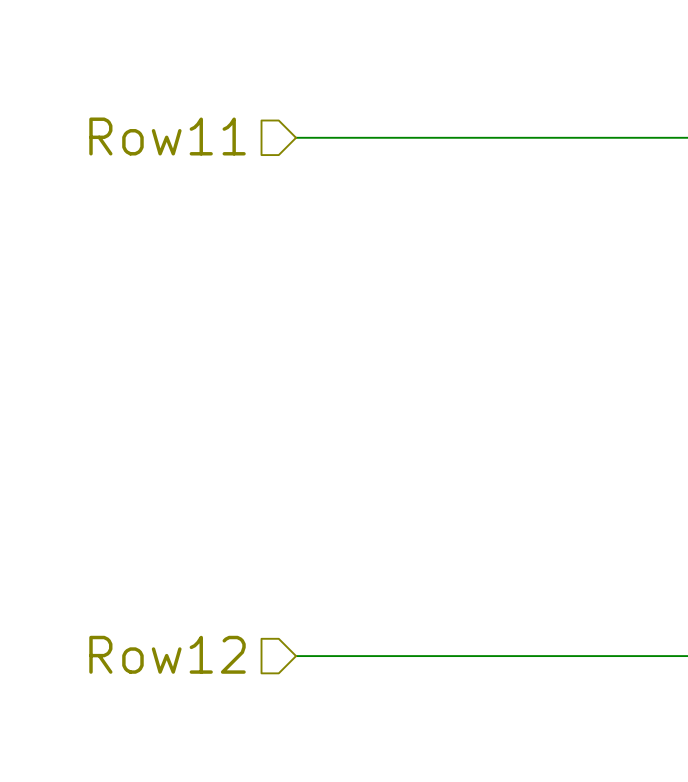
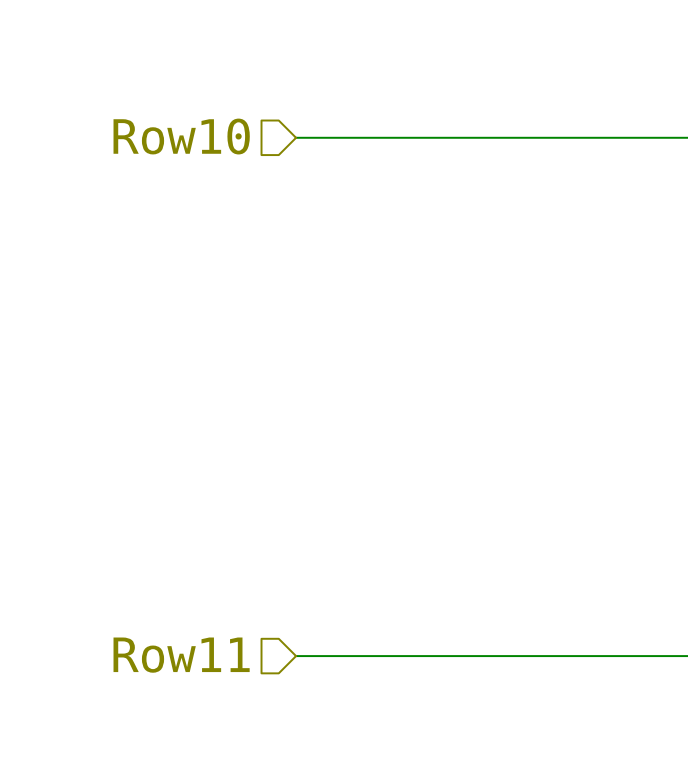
hierarchical label: Row11 (167, 136) -> Row10 (181, 136)
hierarchical label: Row12 (167, 654) -> Row11 (181, 655)

